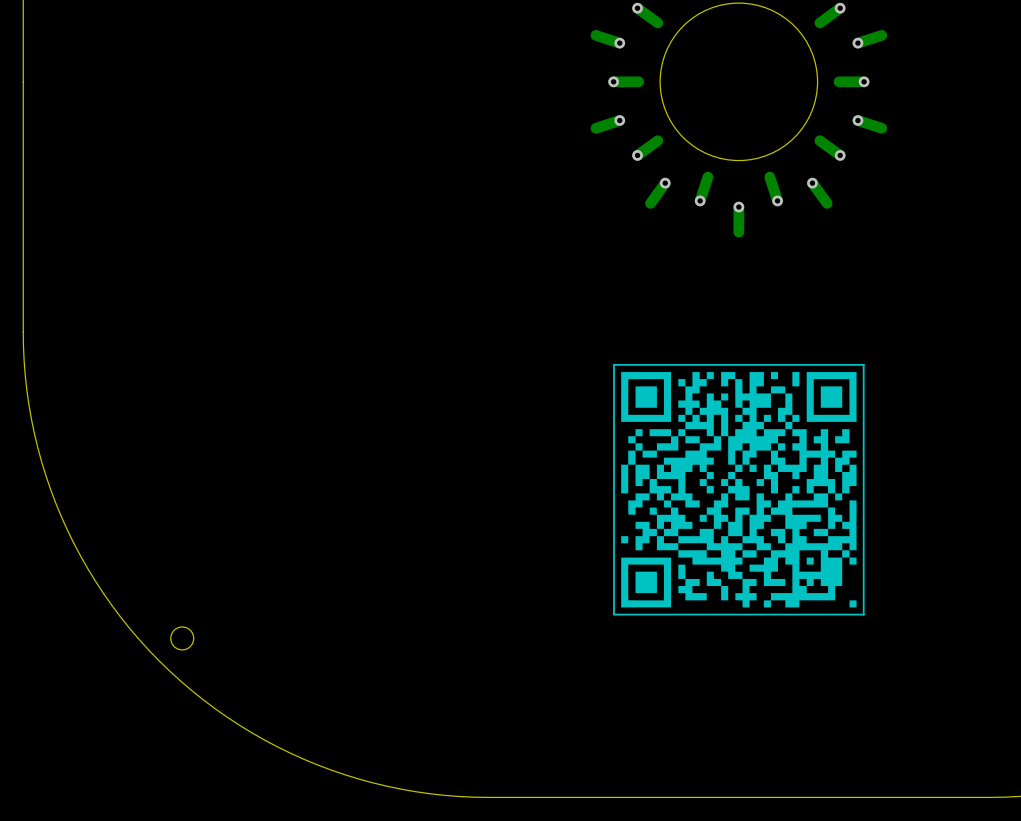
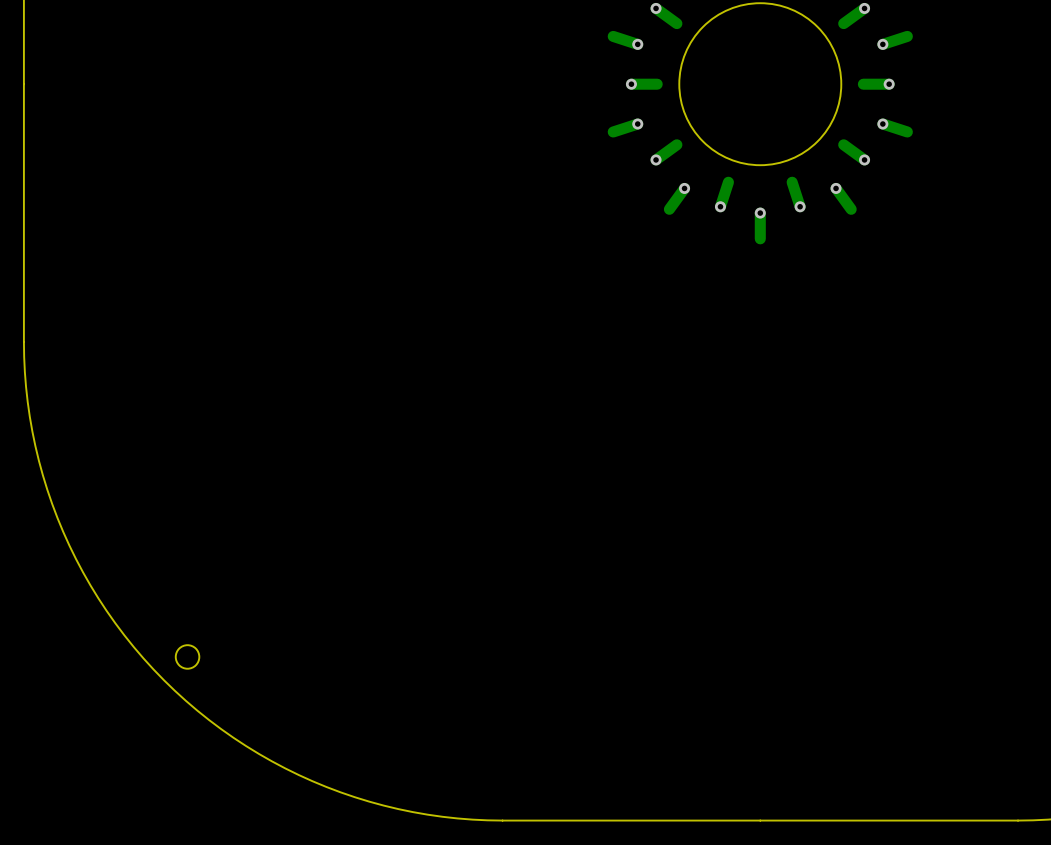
line: (863, 364) (614, 364) (614, 614) (863, 614) (863, 364) -> none
drawing: [621, 372, 857, 608] -> none

